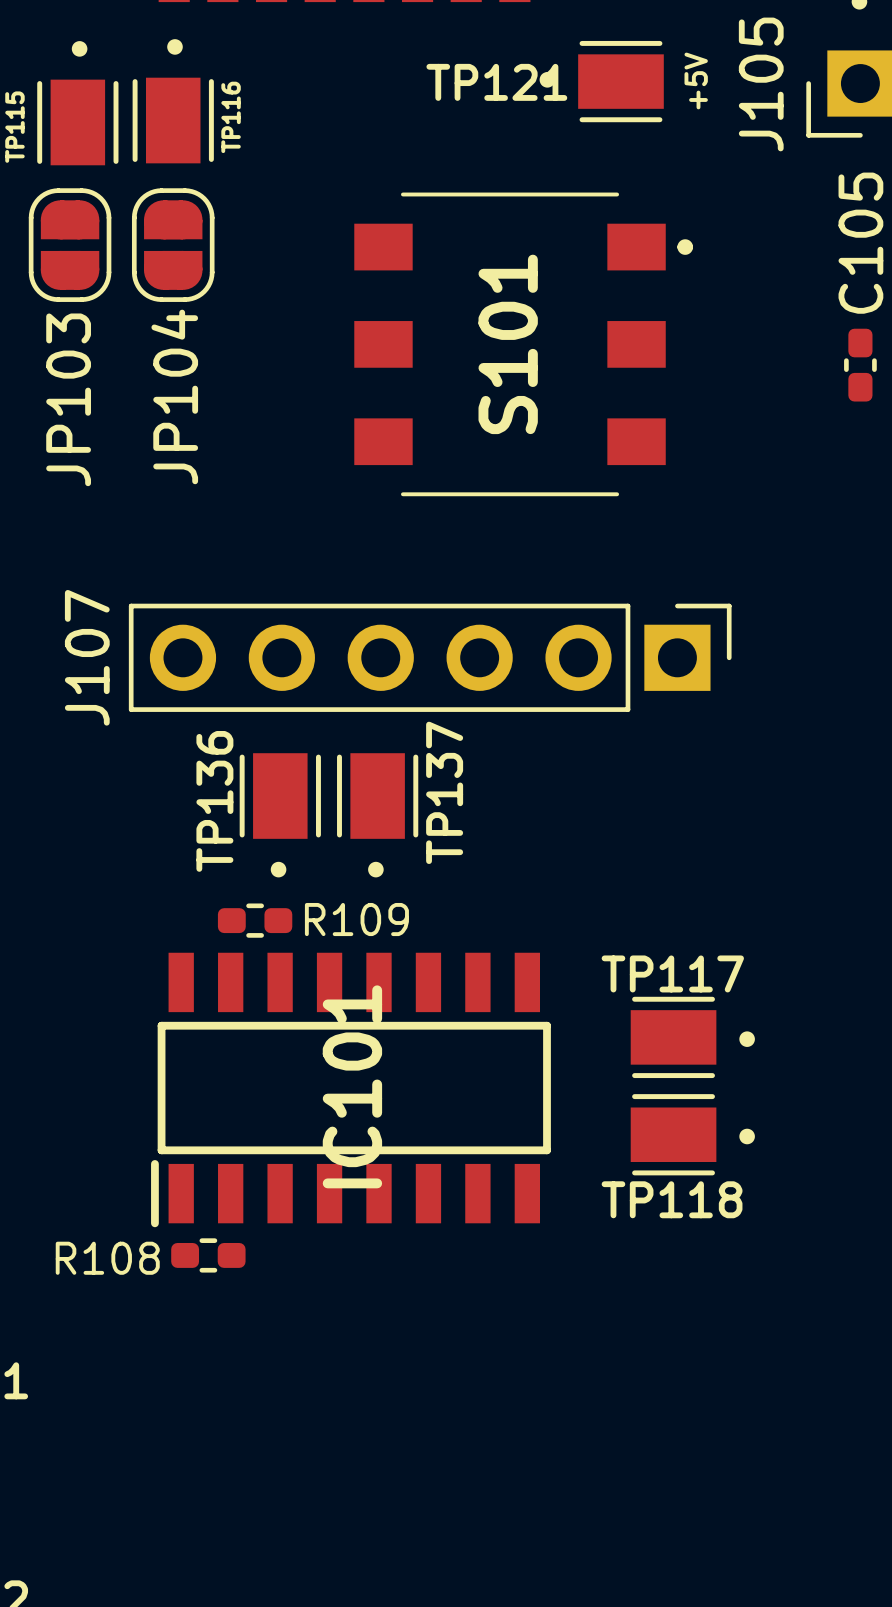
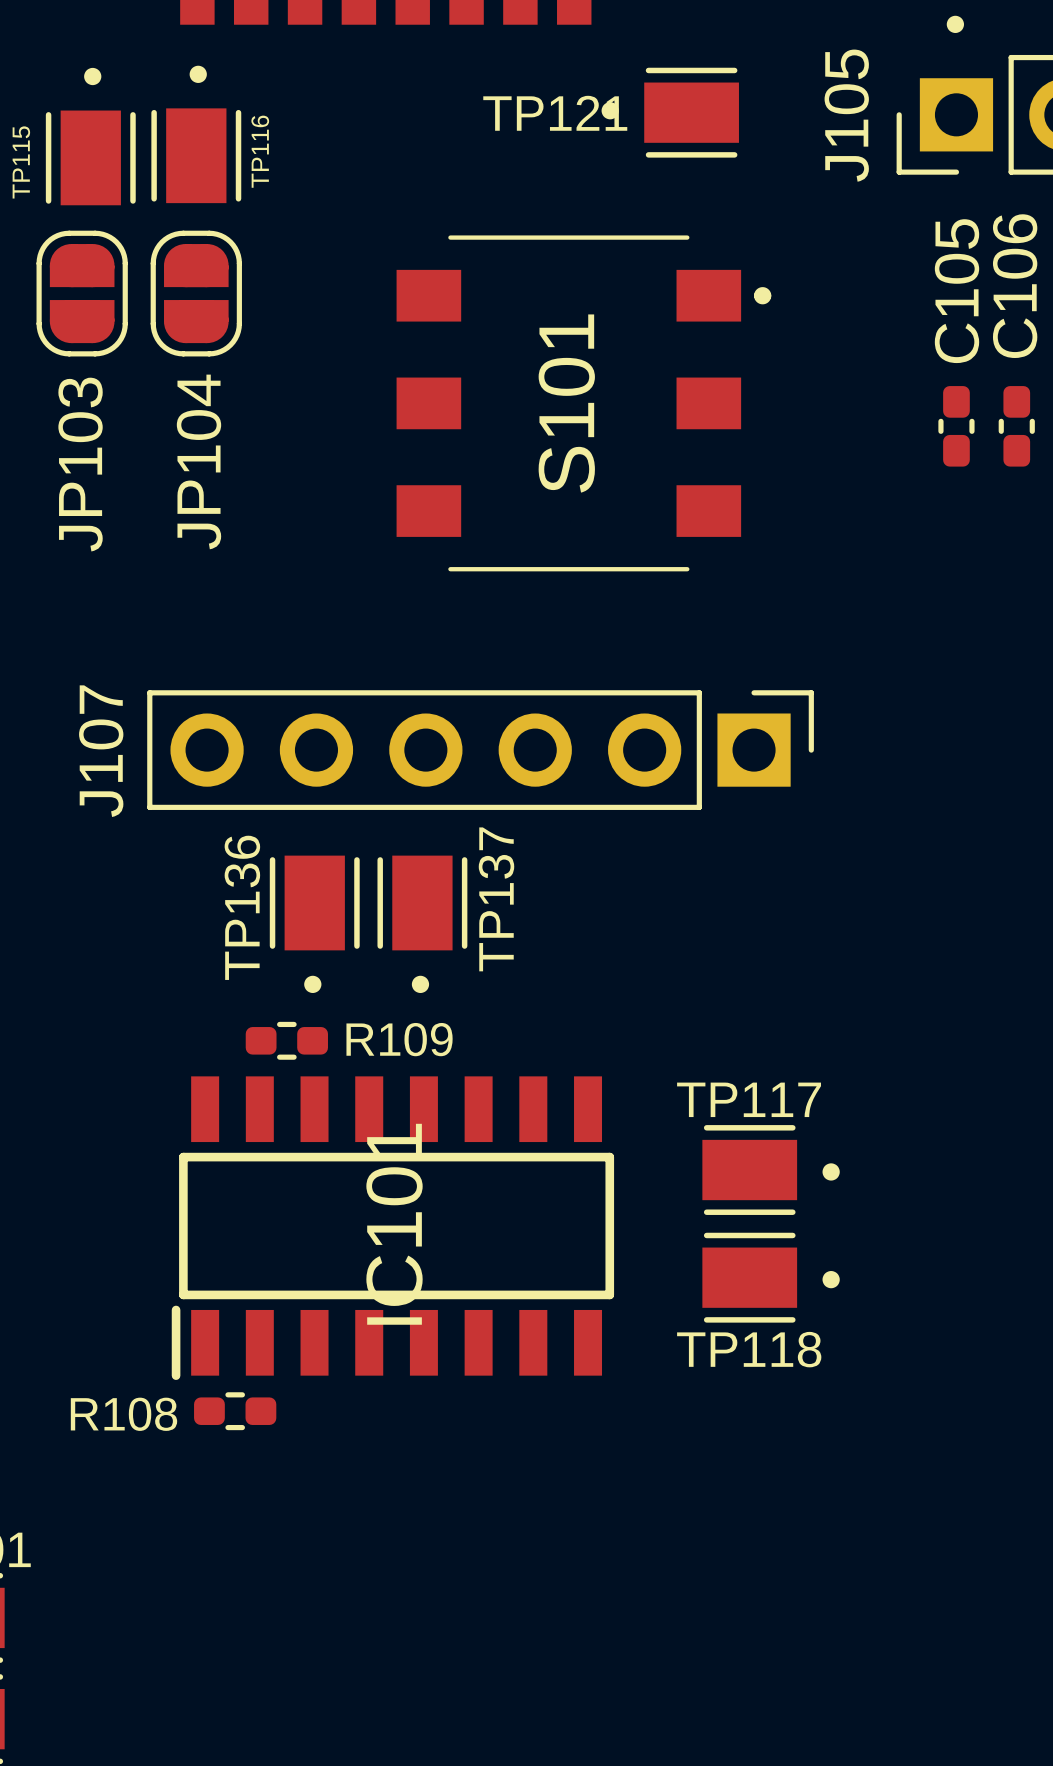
text: +5V (696, 80) -> none

